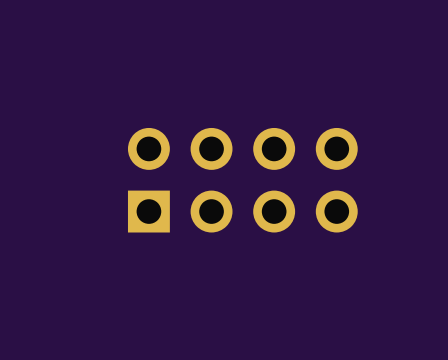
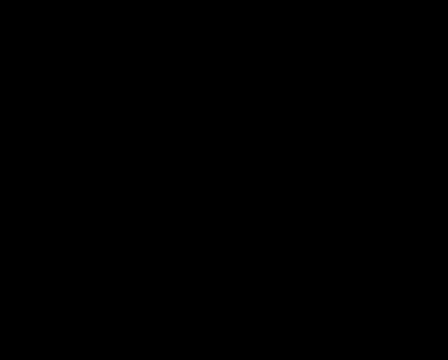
part: (242, 180) -> none

